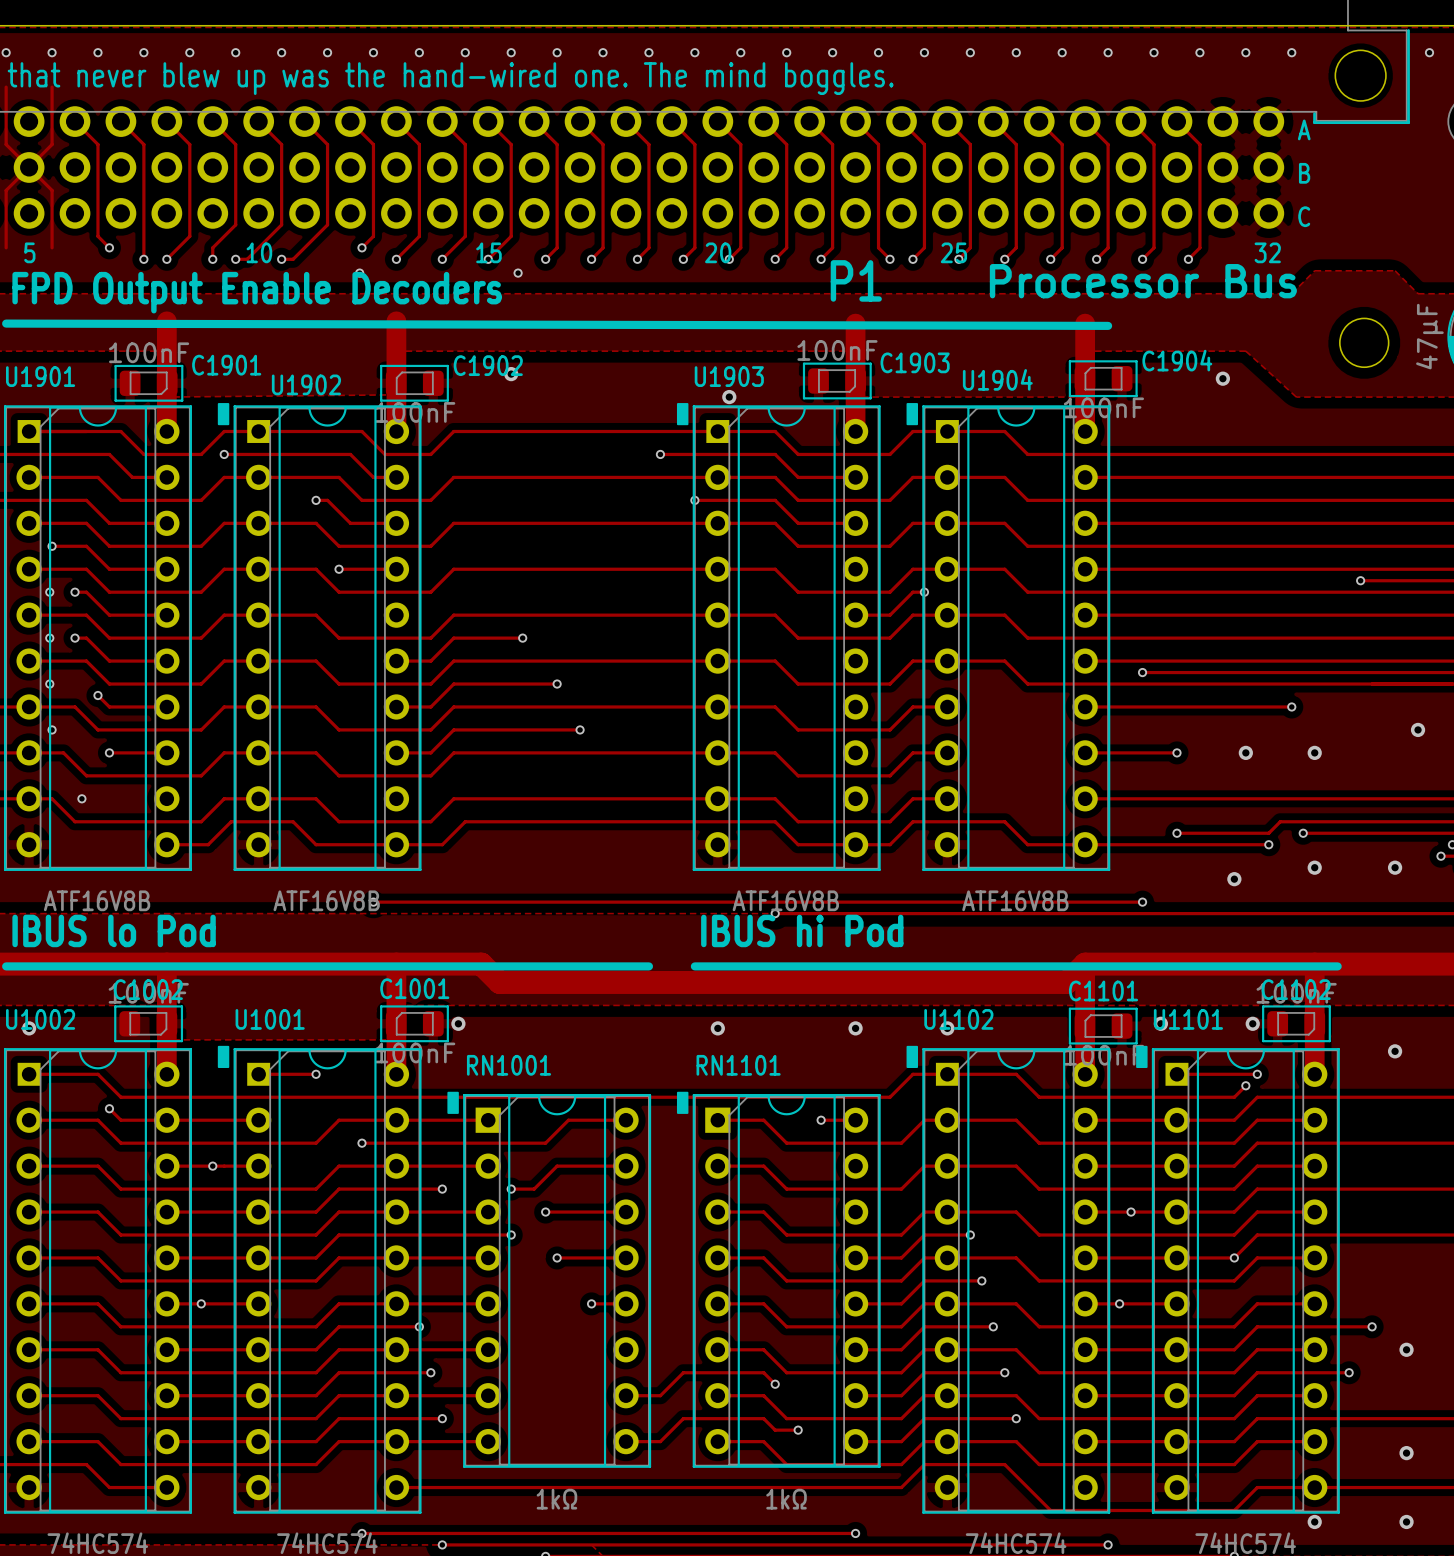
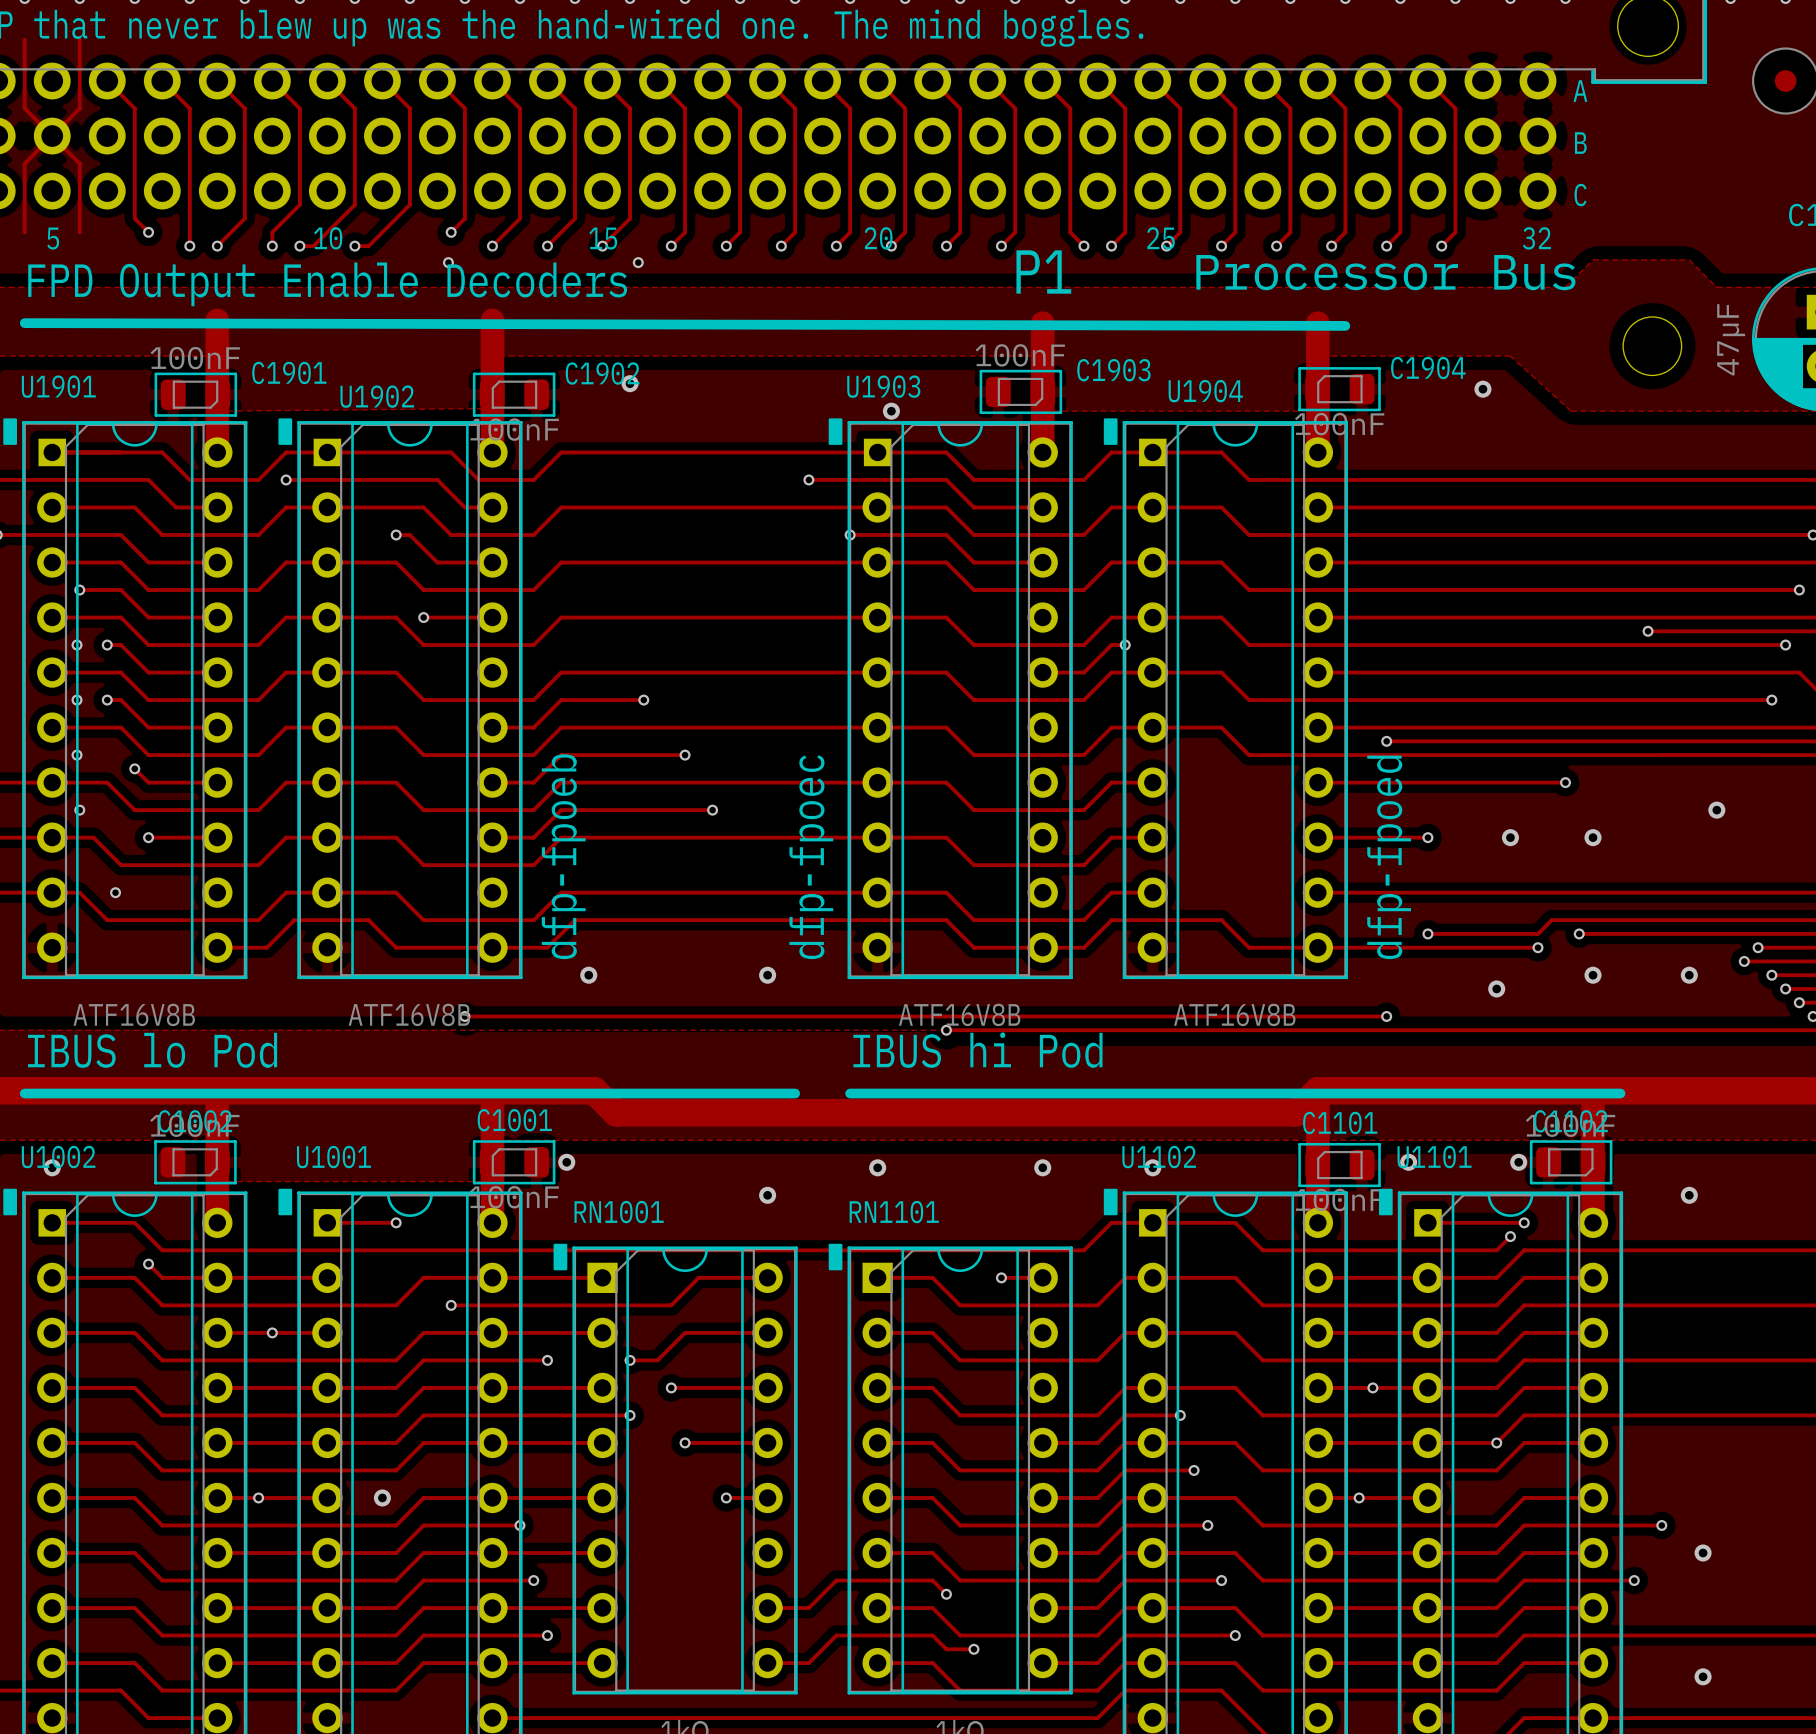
text: none -> dfp-fpoeb (563, 856)
text: none -> dfp-fpoec (811, 857)
text: none -> dfp-fpoed (1389, 857)
via: none -> (588, 975)
via: none -> (767, 975)
via: none -> (767, 1195)
via: none -> (382, 1497)

